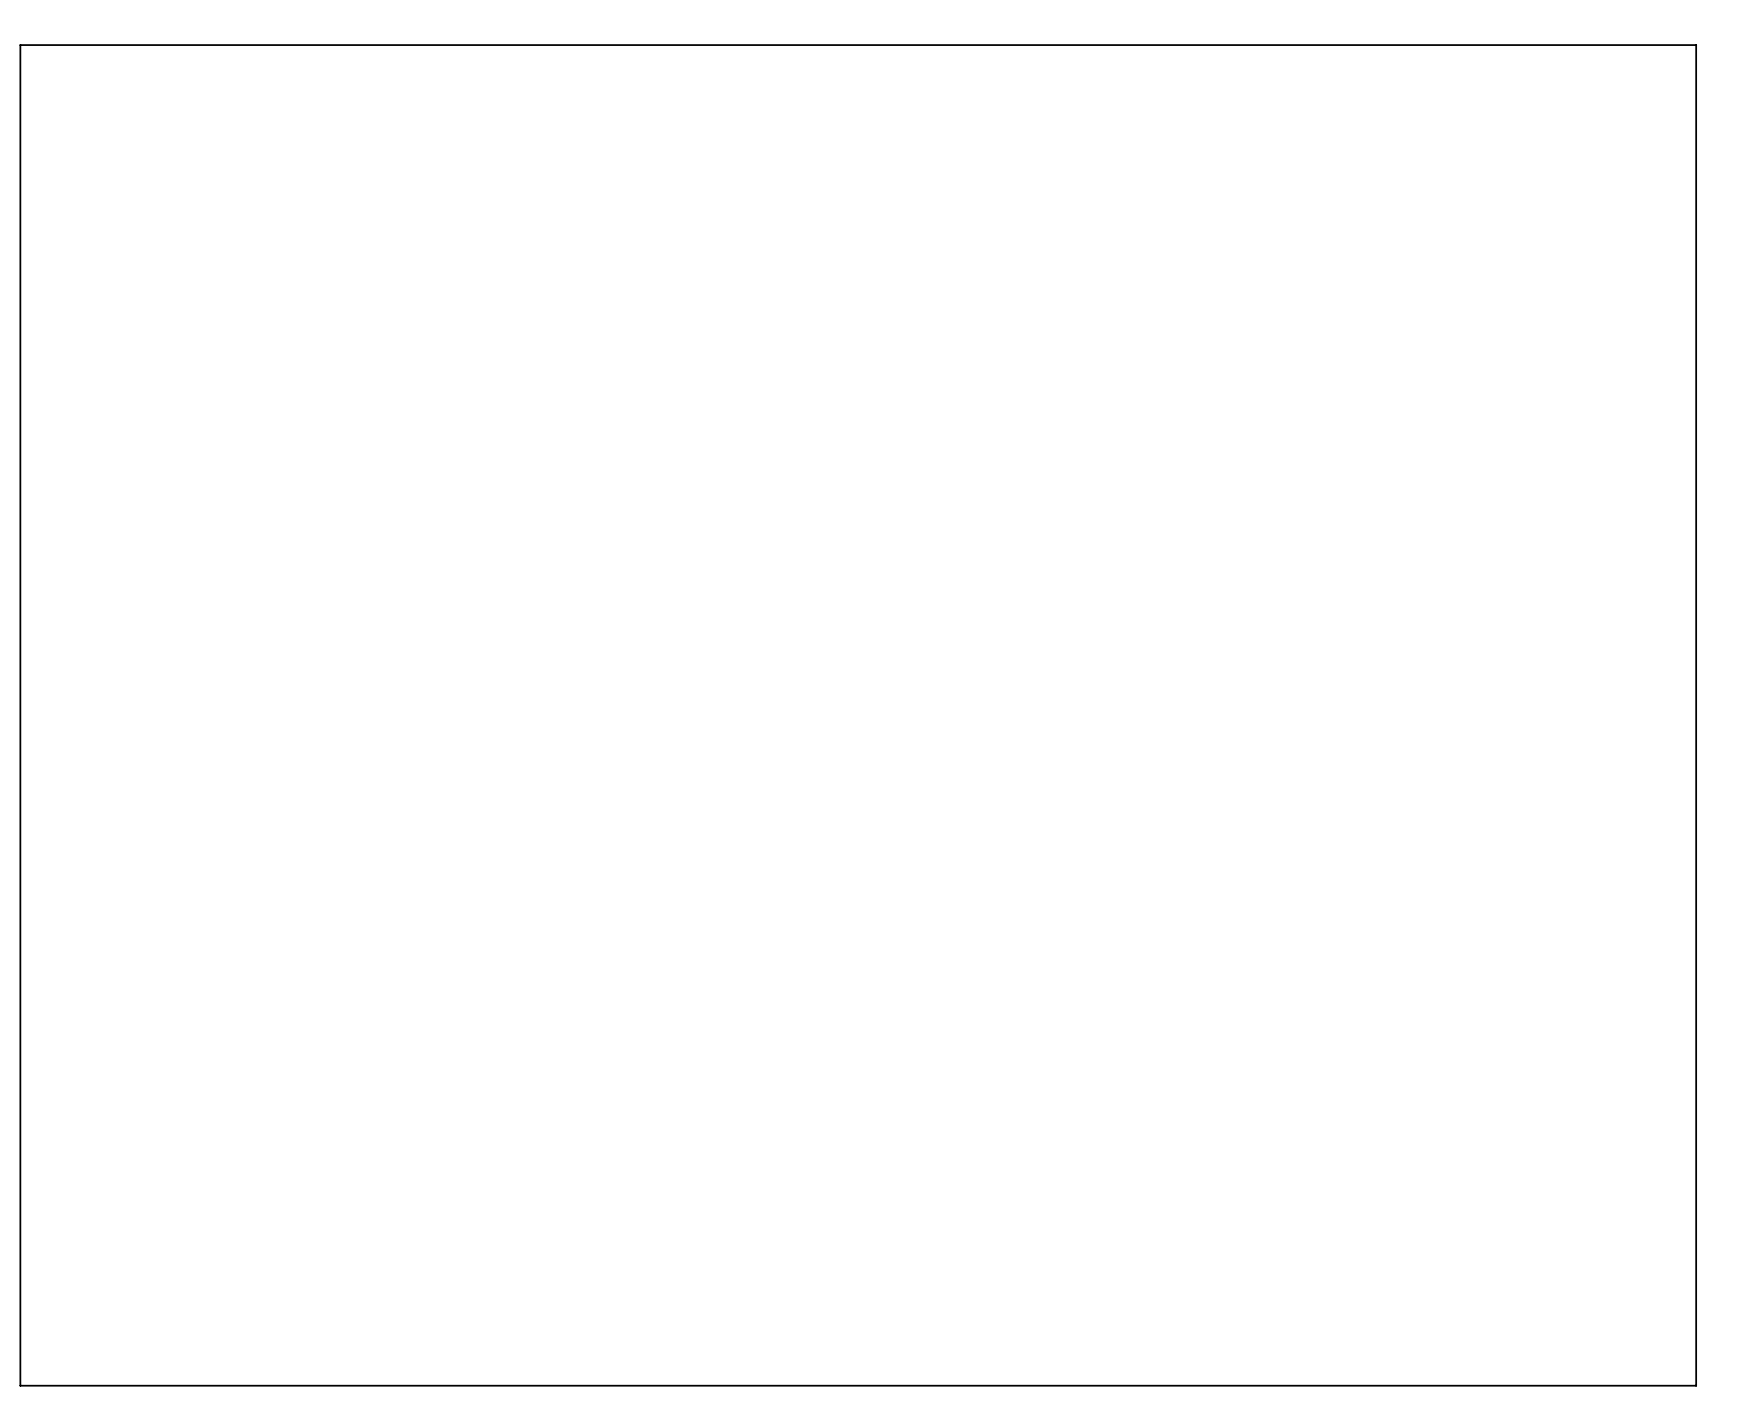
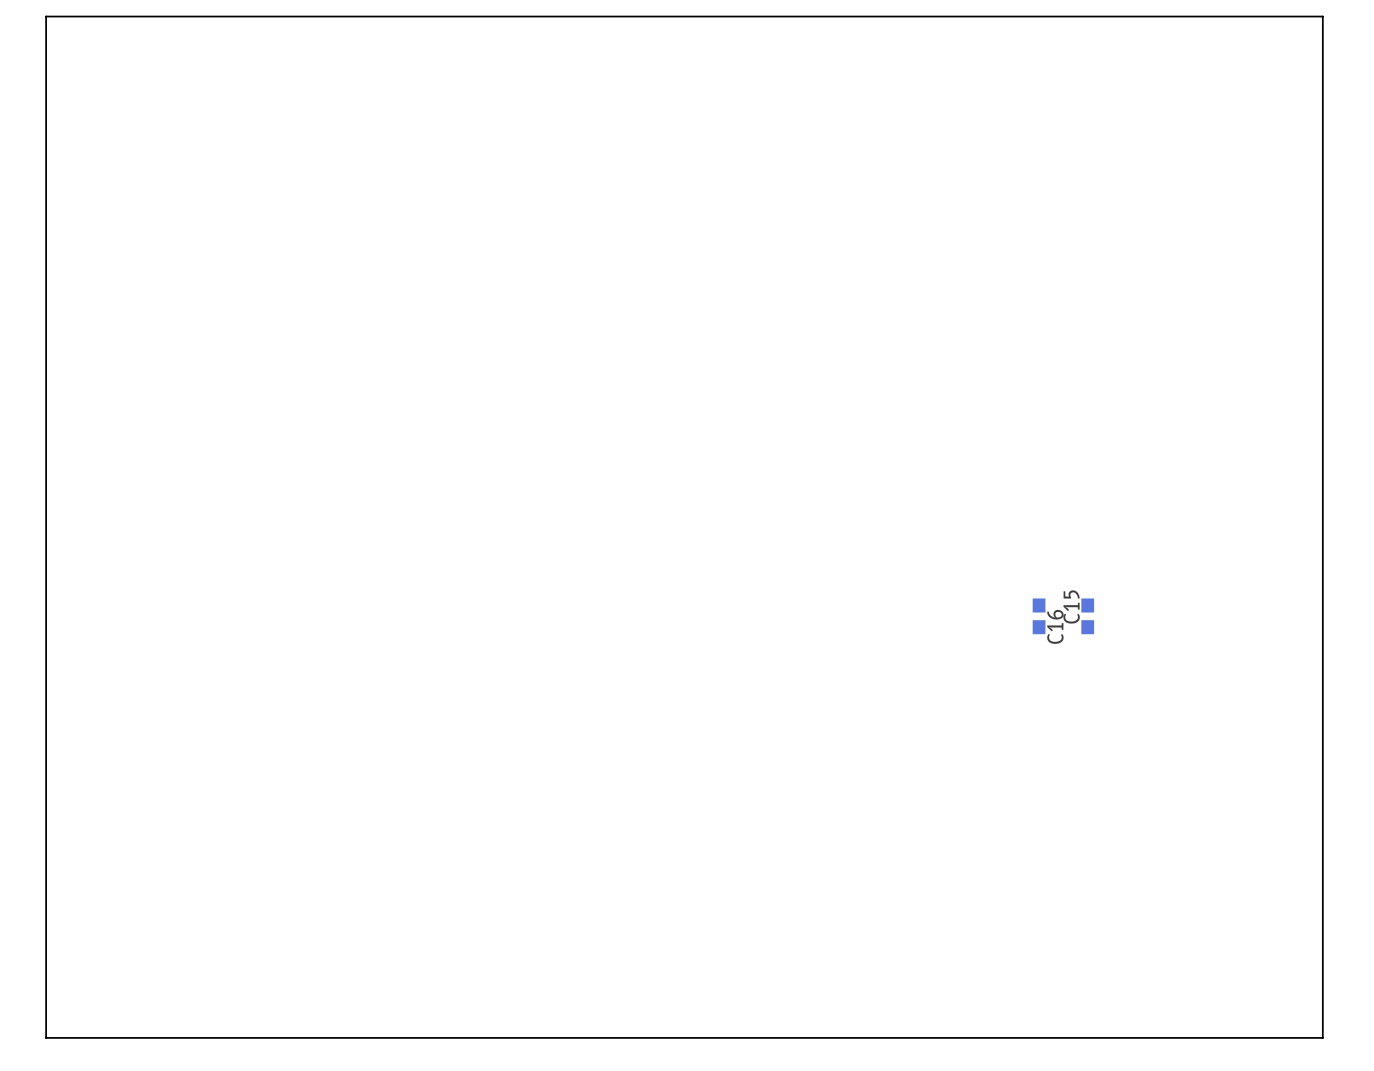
C16: none -> (1039, 616)
C15: none -> (1087, 616)

